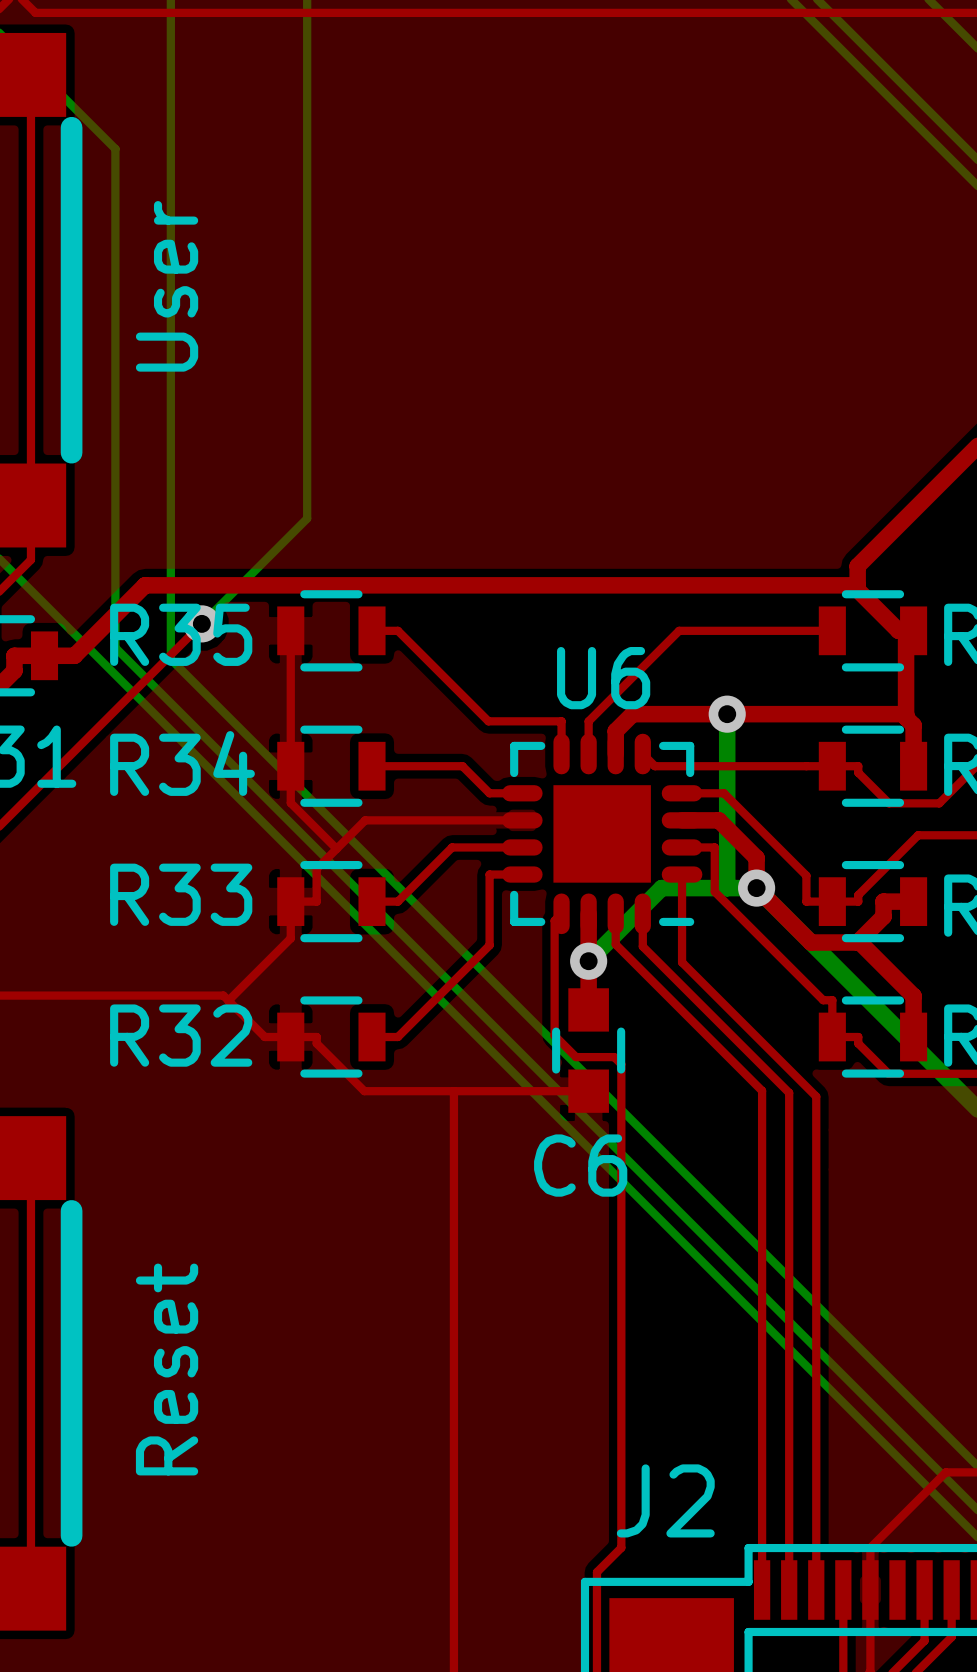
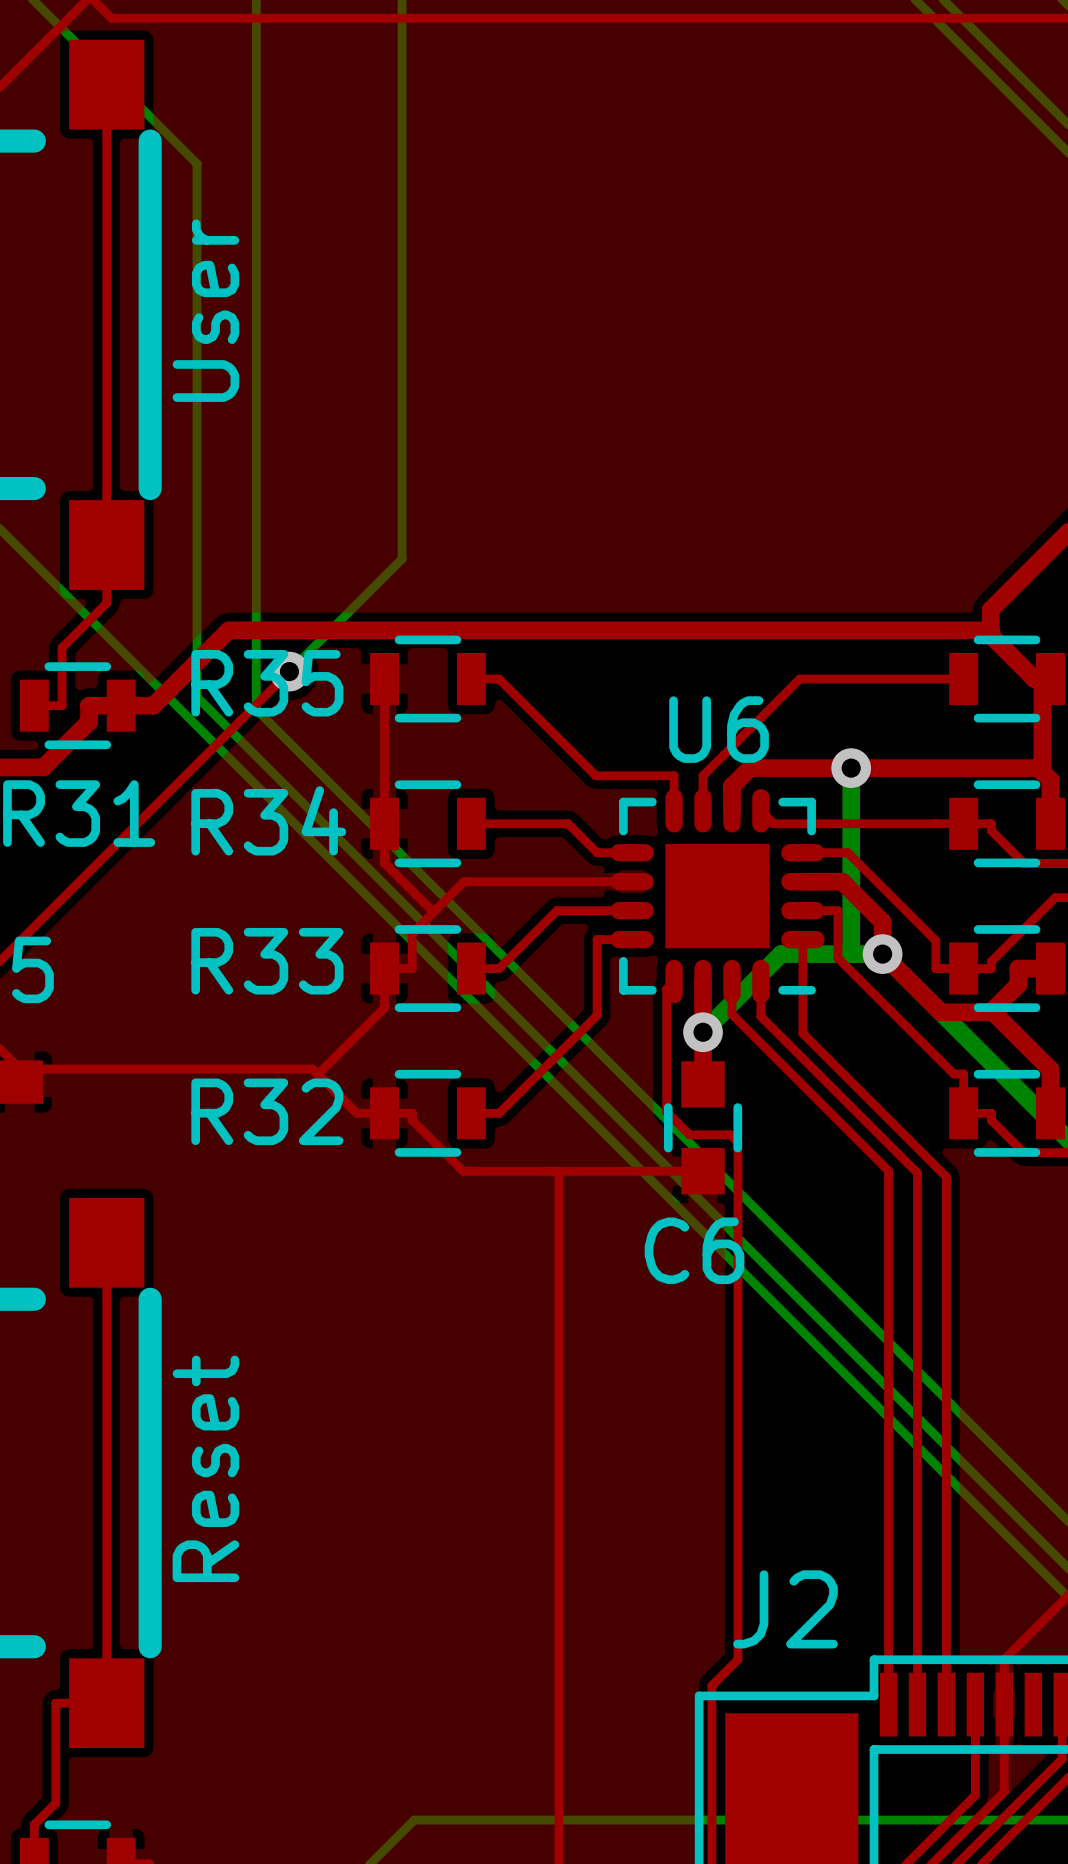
User name position: User (167, 286) -> User (205, 310)
Reset name position: Reset (167, 1369) -> Reset (205, 1468)

